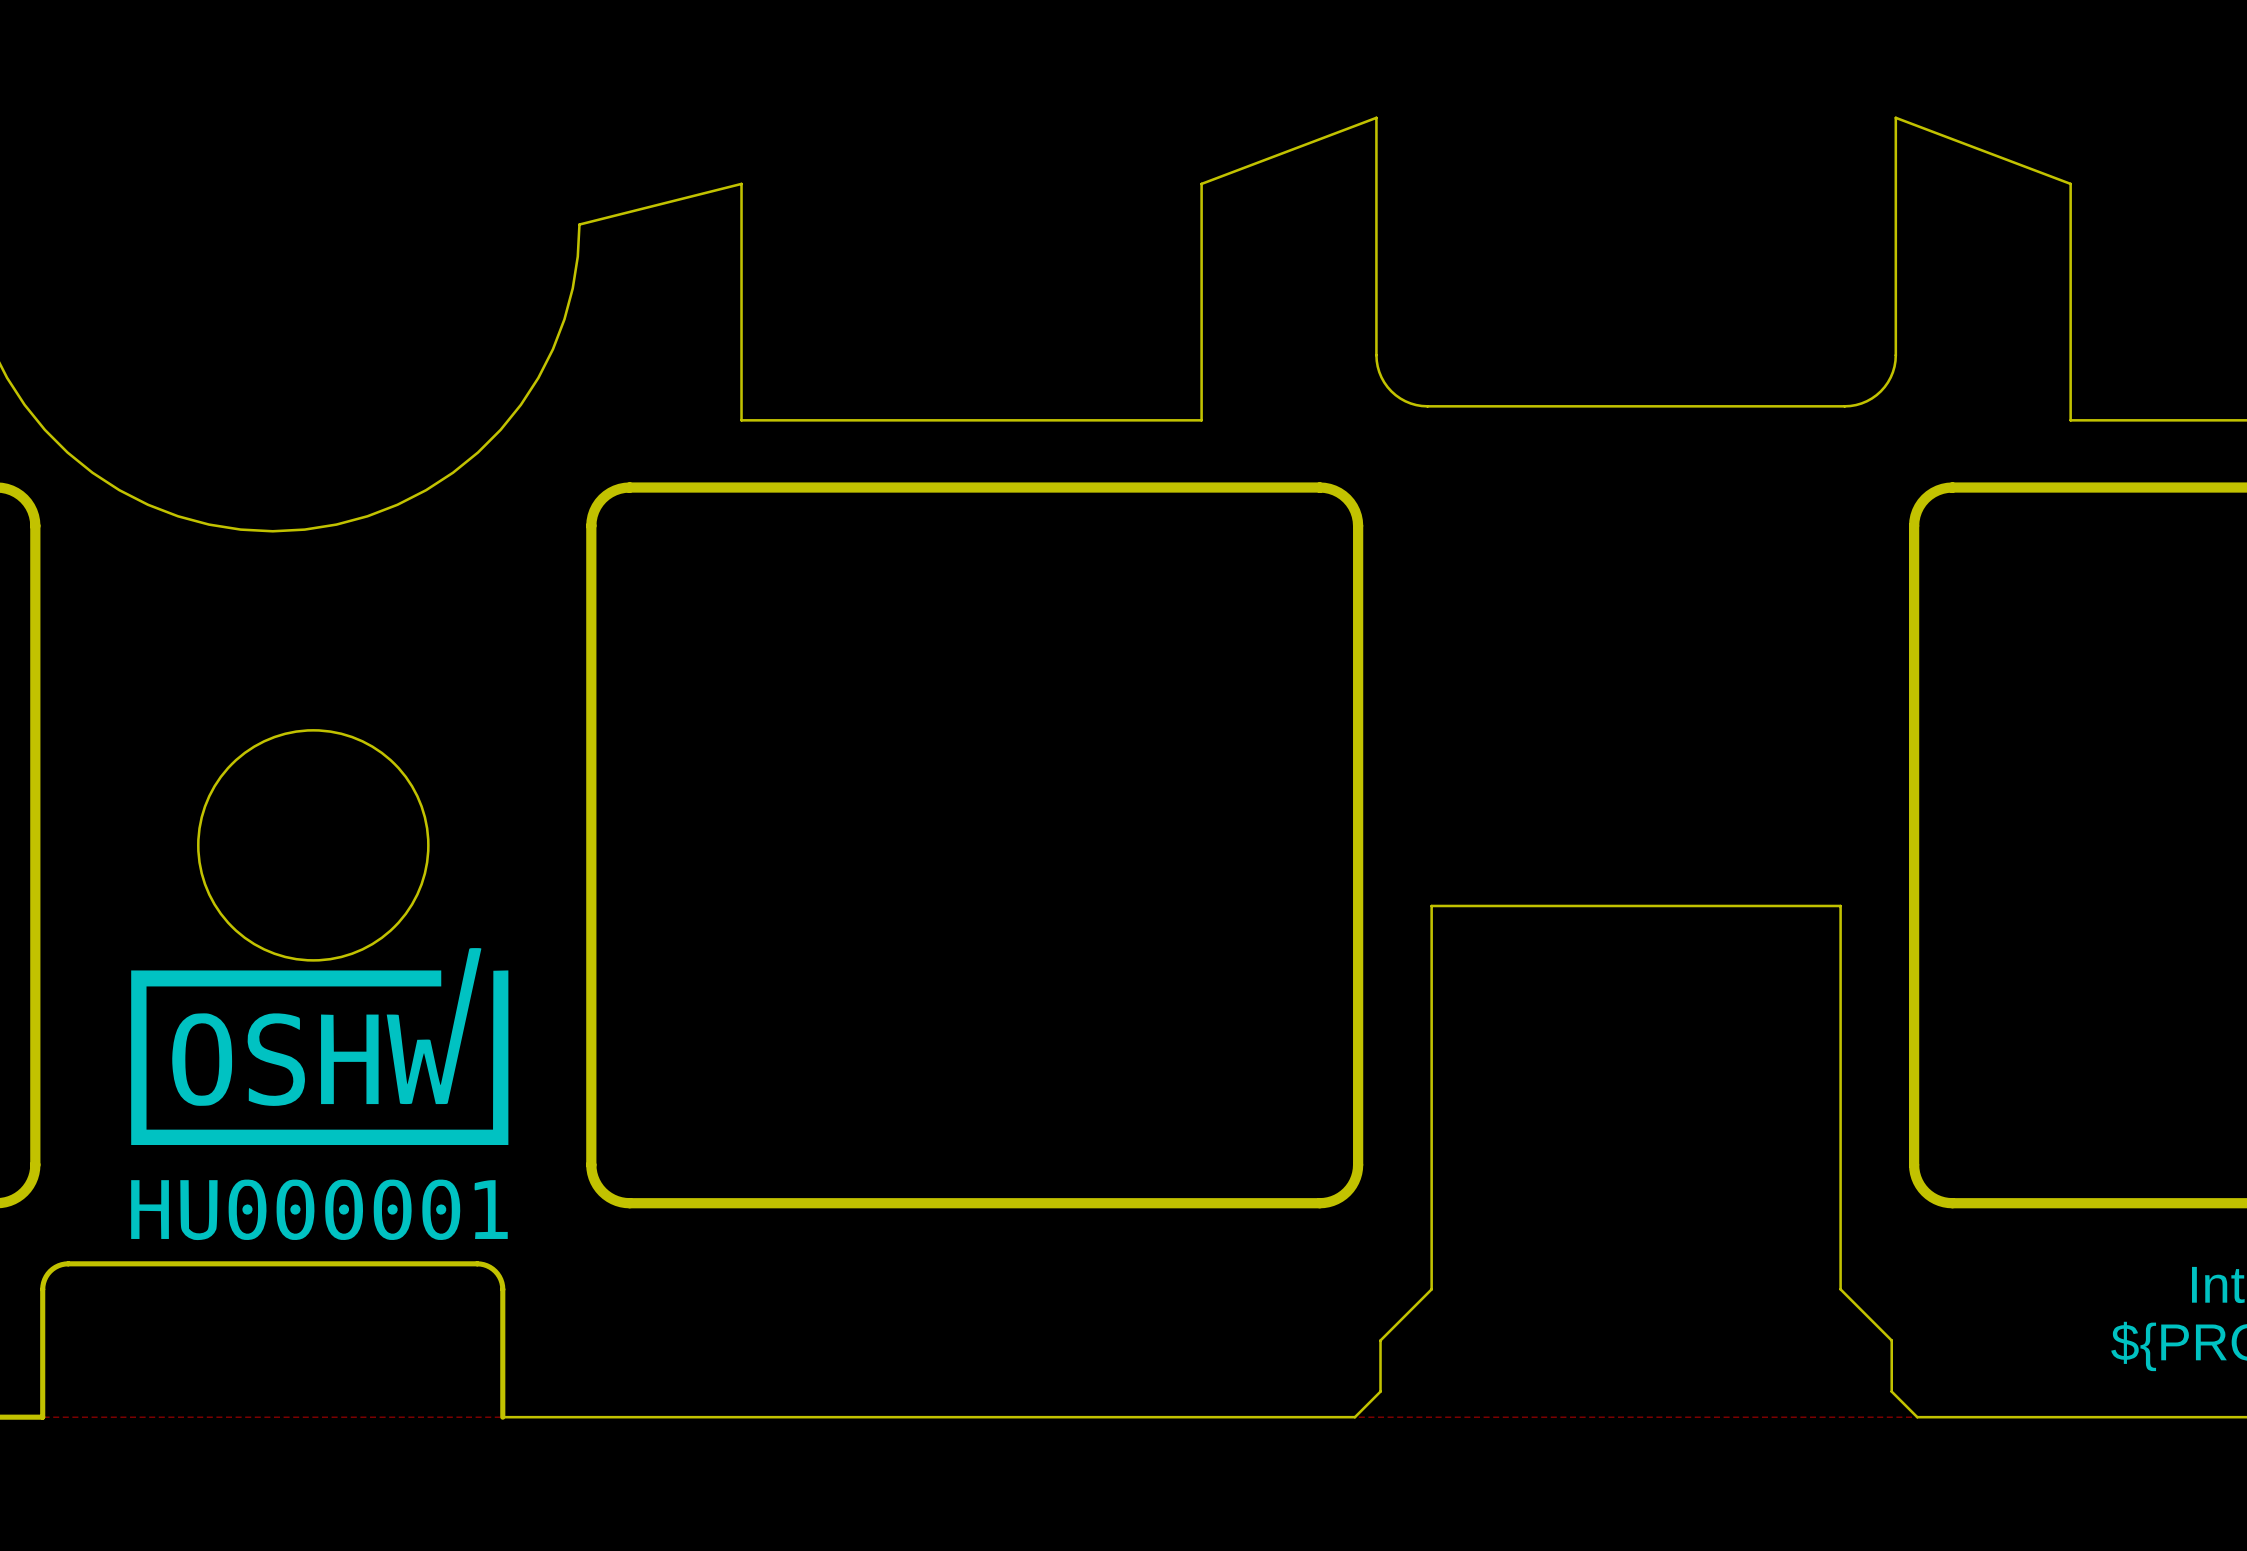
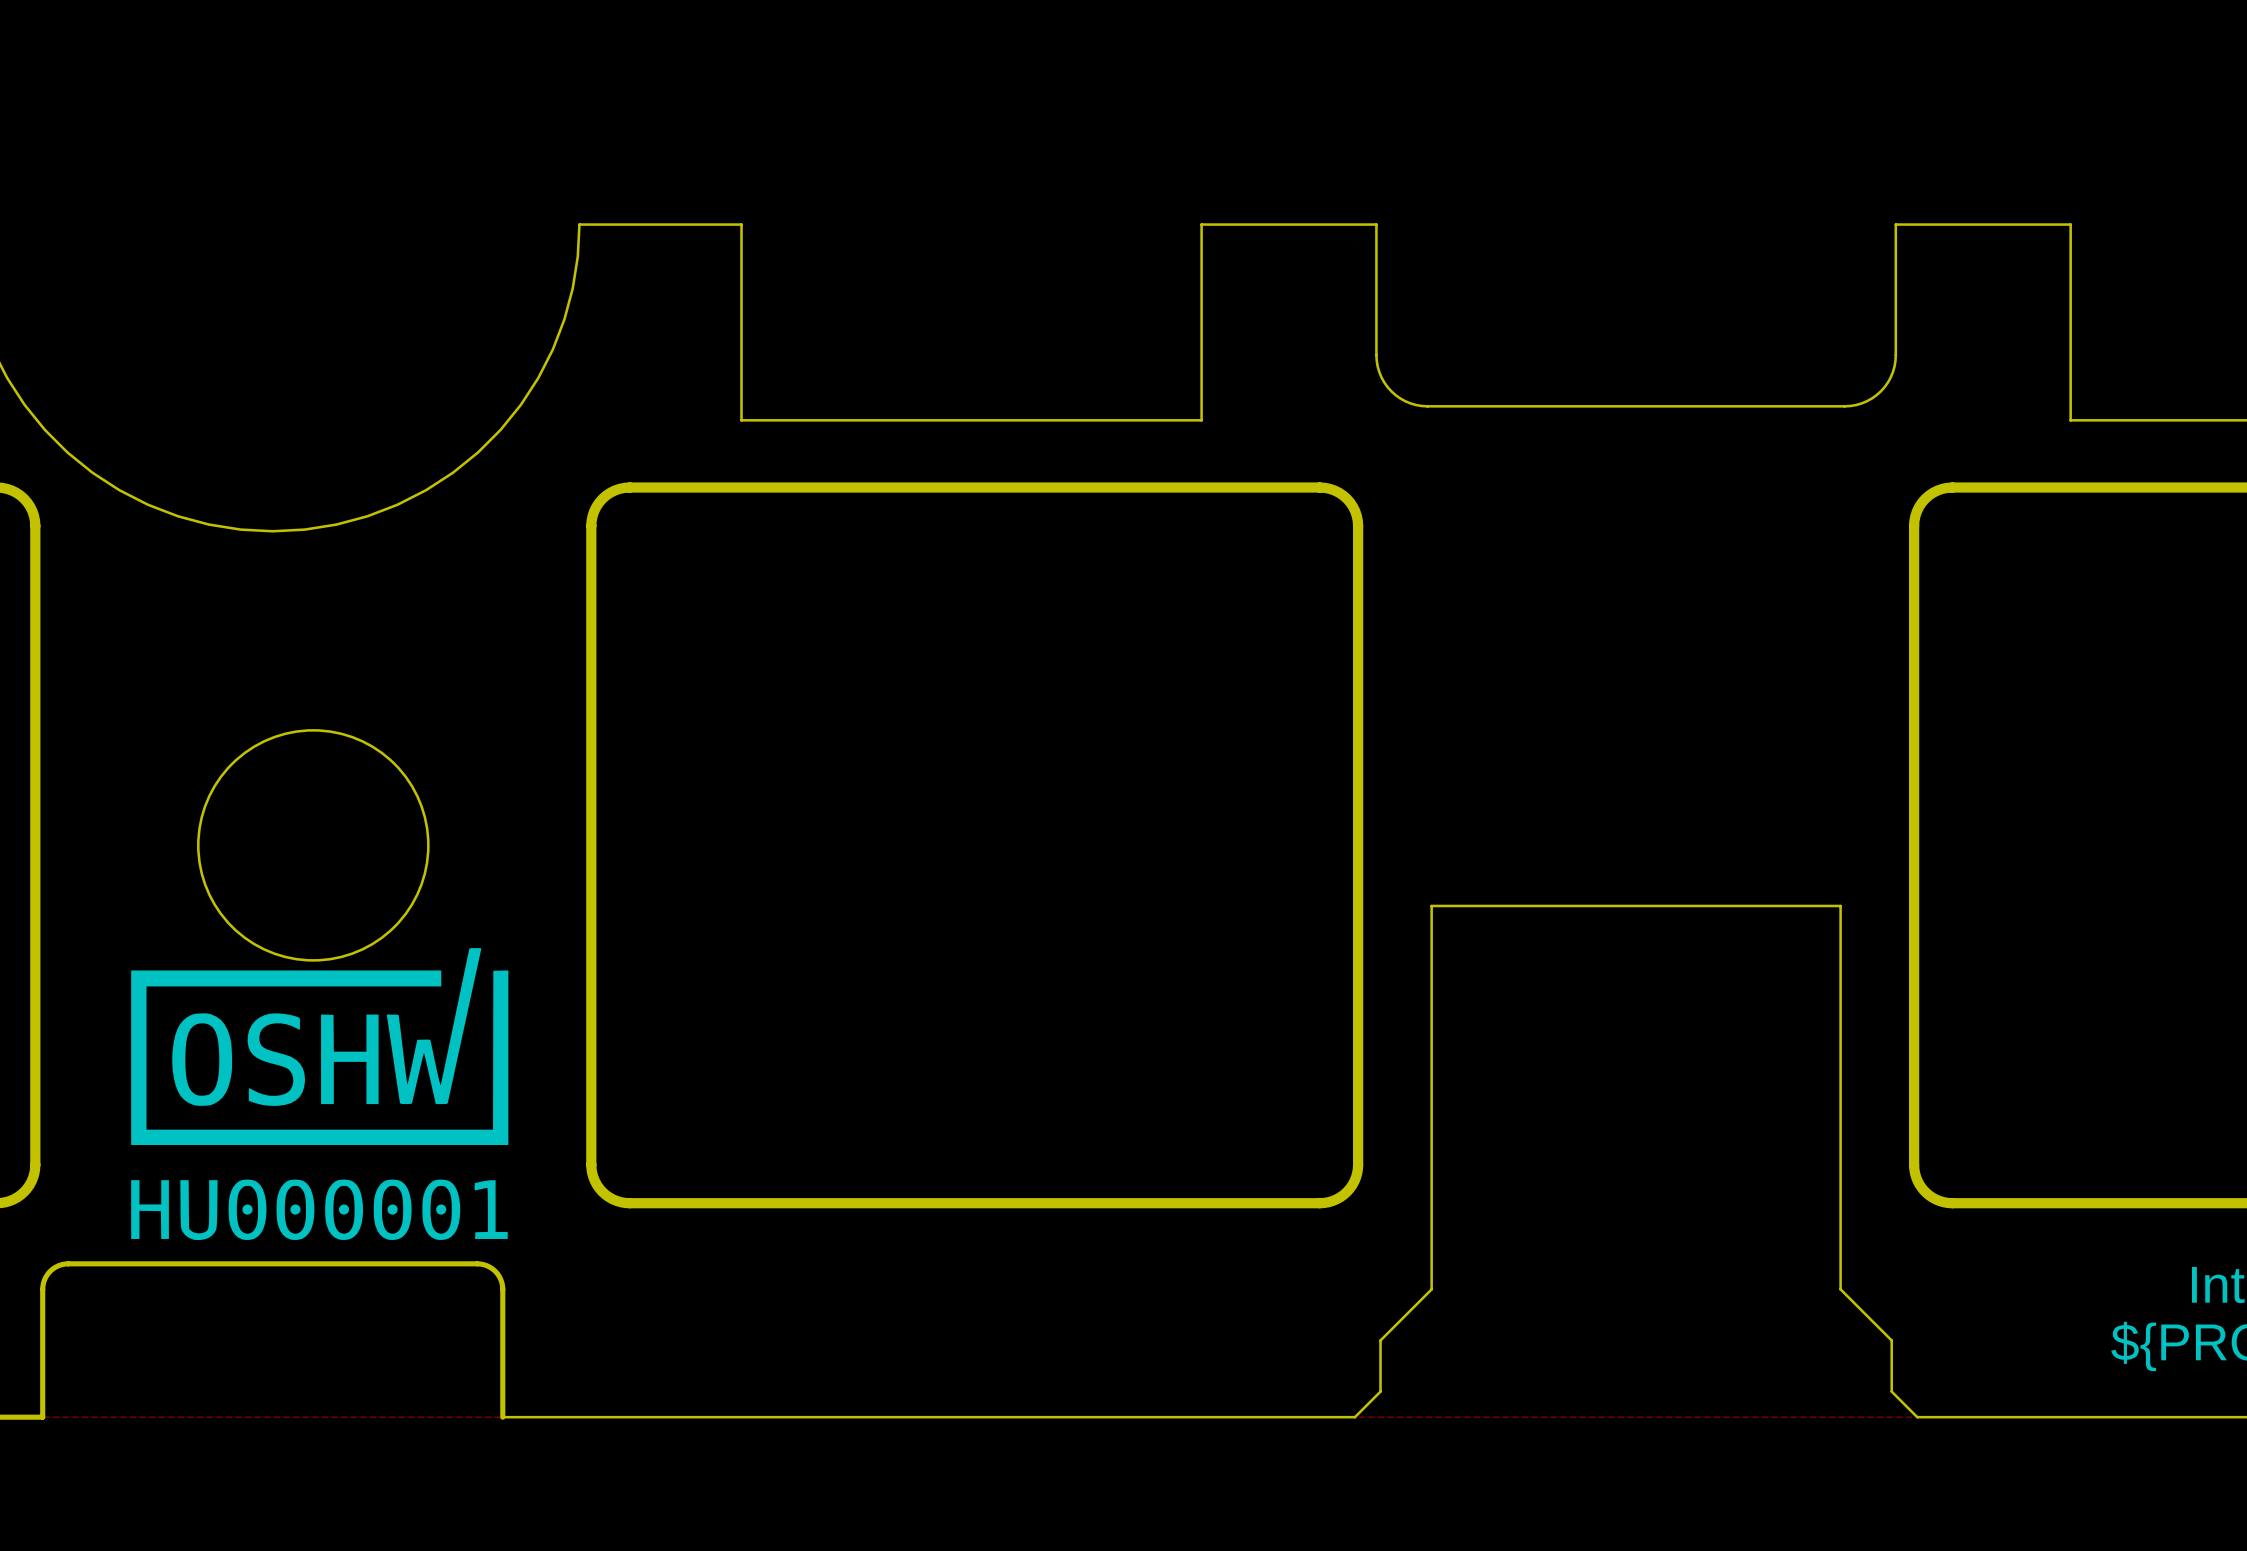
board edge: (579, 224) (741, 183) (741, 224) -> (579, 224) (741, 224)
board edge: (1201, 224) (1201, 183) (1376, 117) (1376, 224) -> (1201, 224) (1376, 224)
board edge: (1895, 224) (1895, 117) (2070, 183) (2070, 224) -> (1895, 224) (2070, 224)

